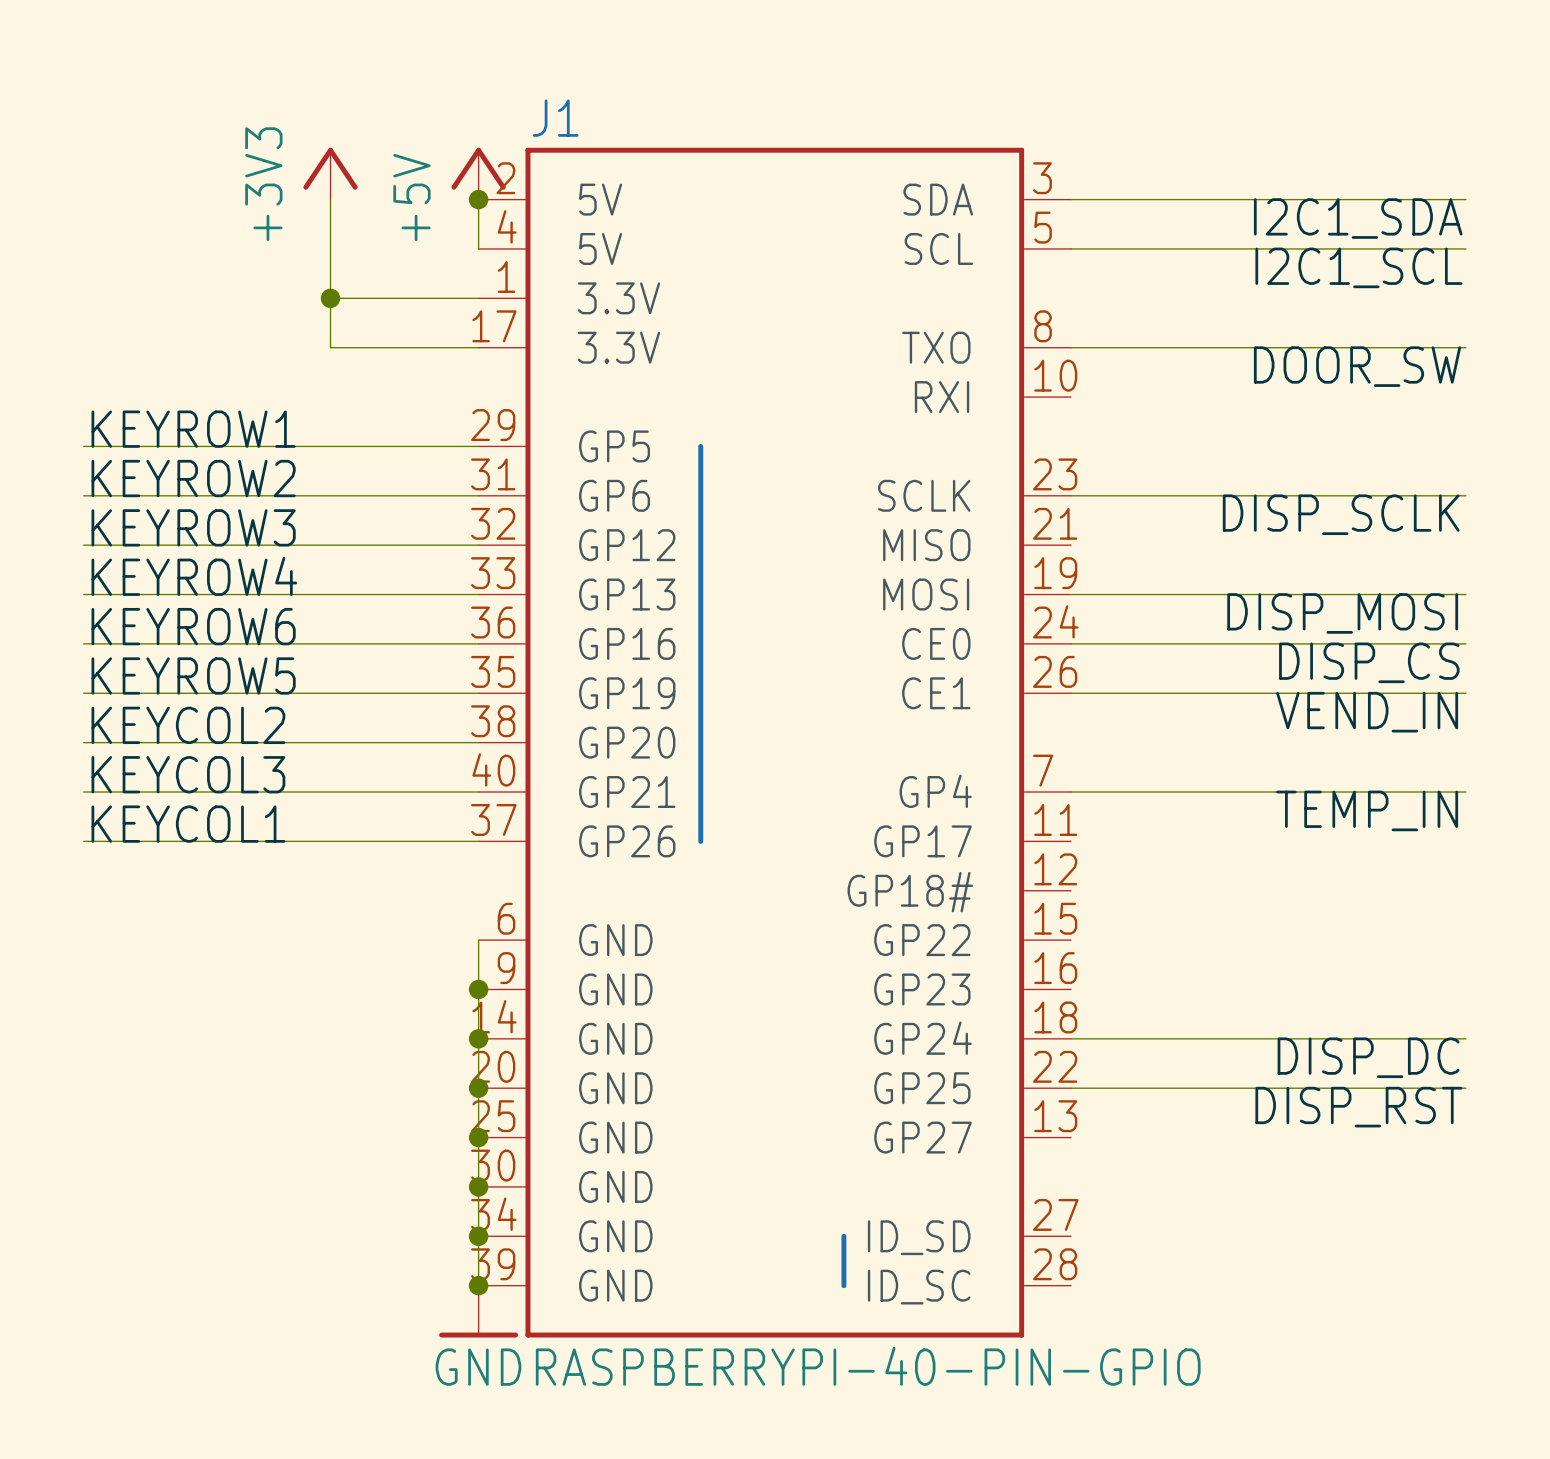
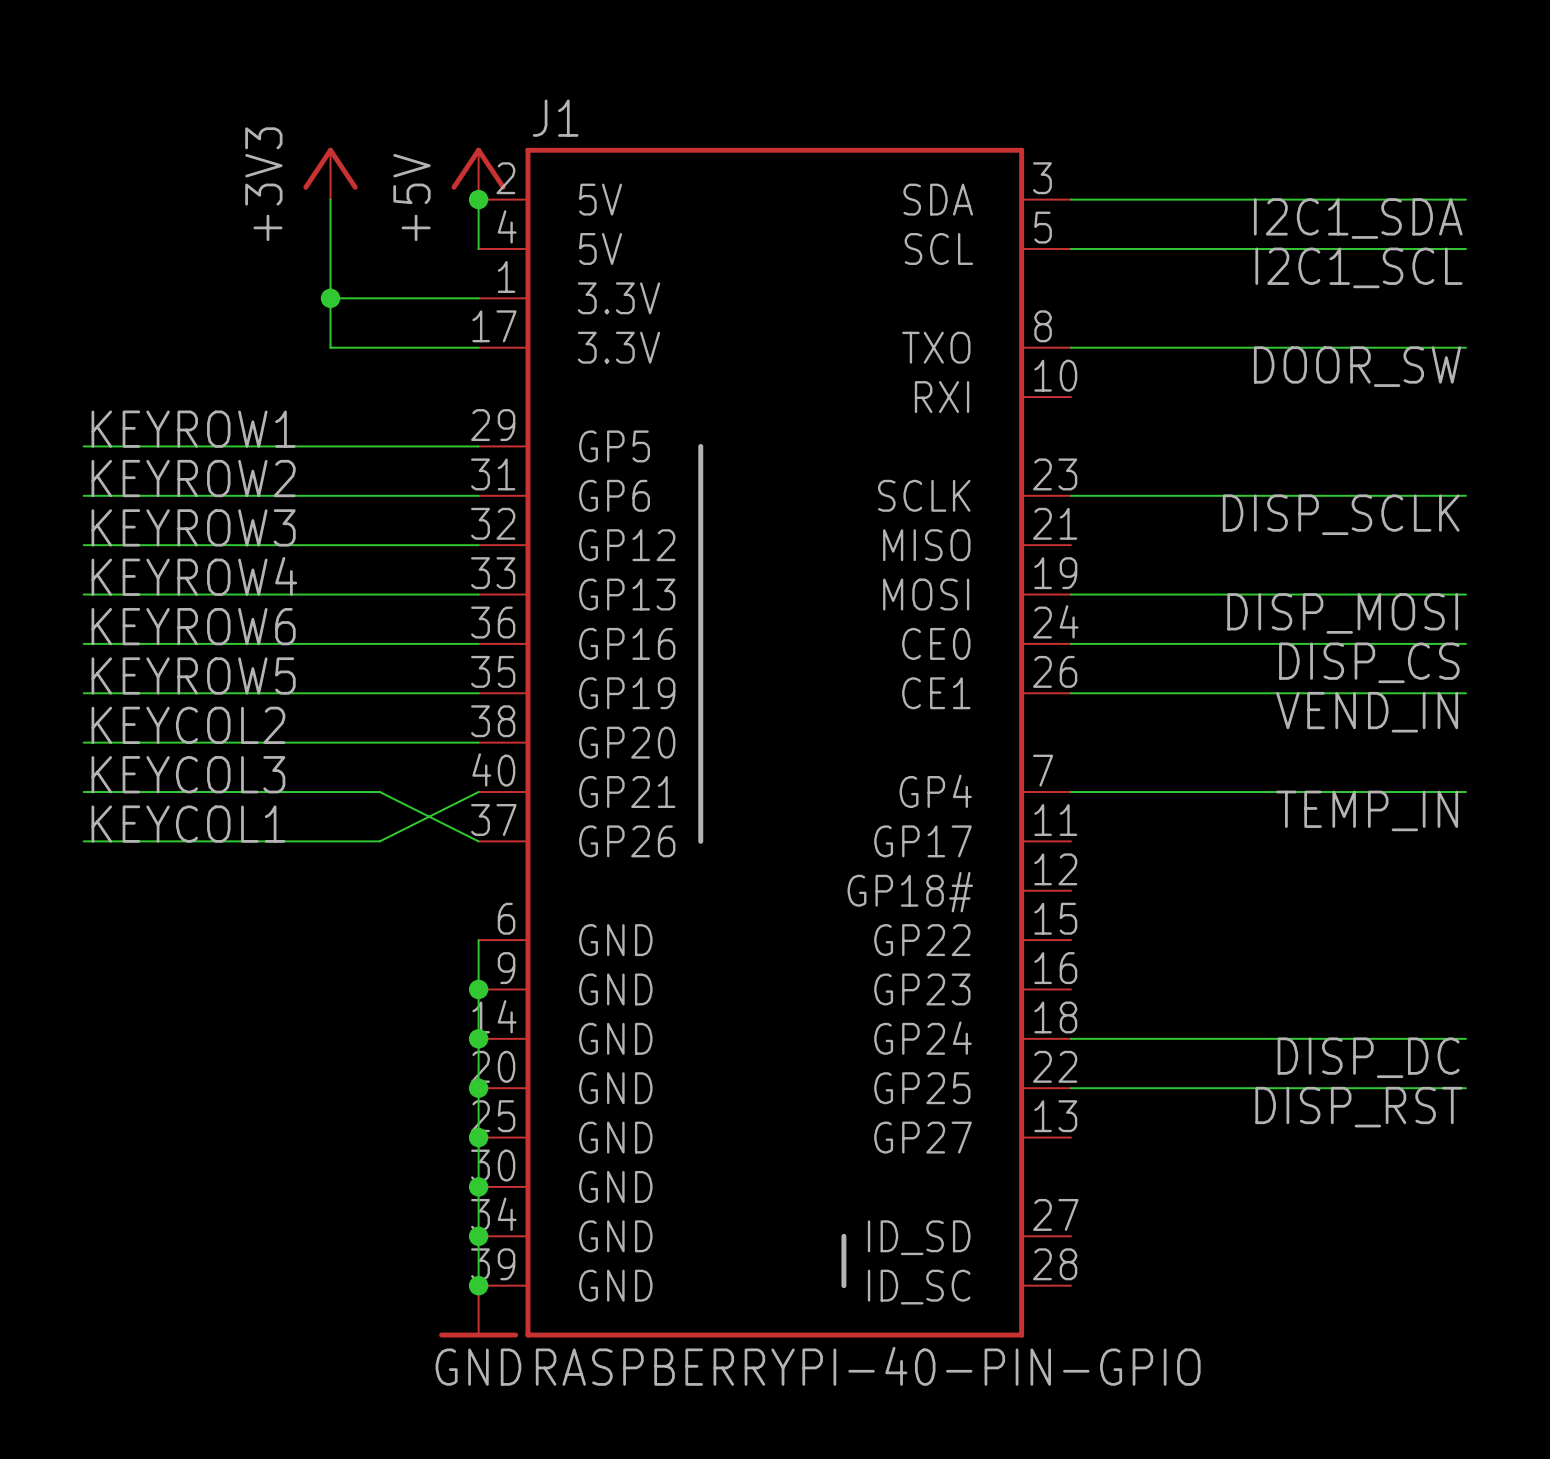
wire: (379, 792) (478, 792) -> (379, 792) (478, 841)
wire: (379, 841) (478, 841) -> (379, 841) (478, 792)

